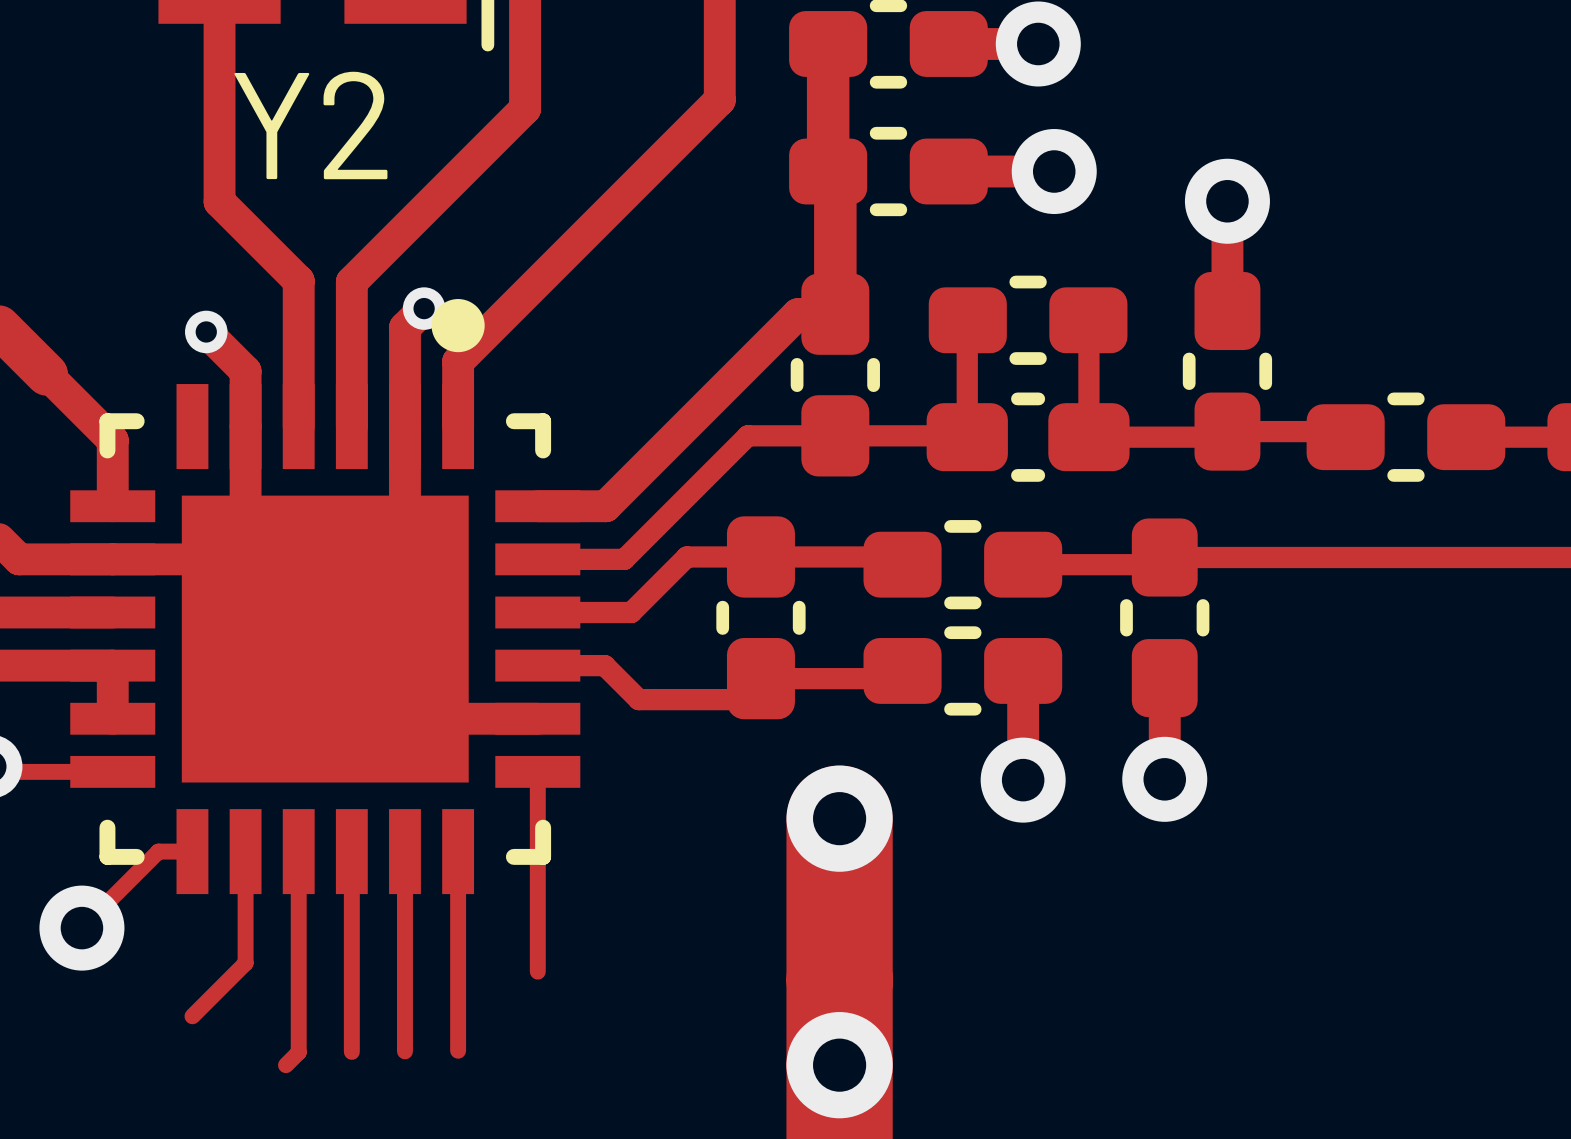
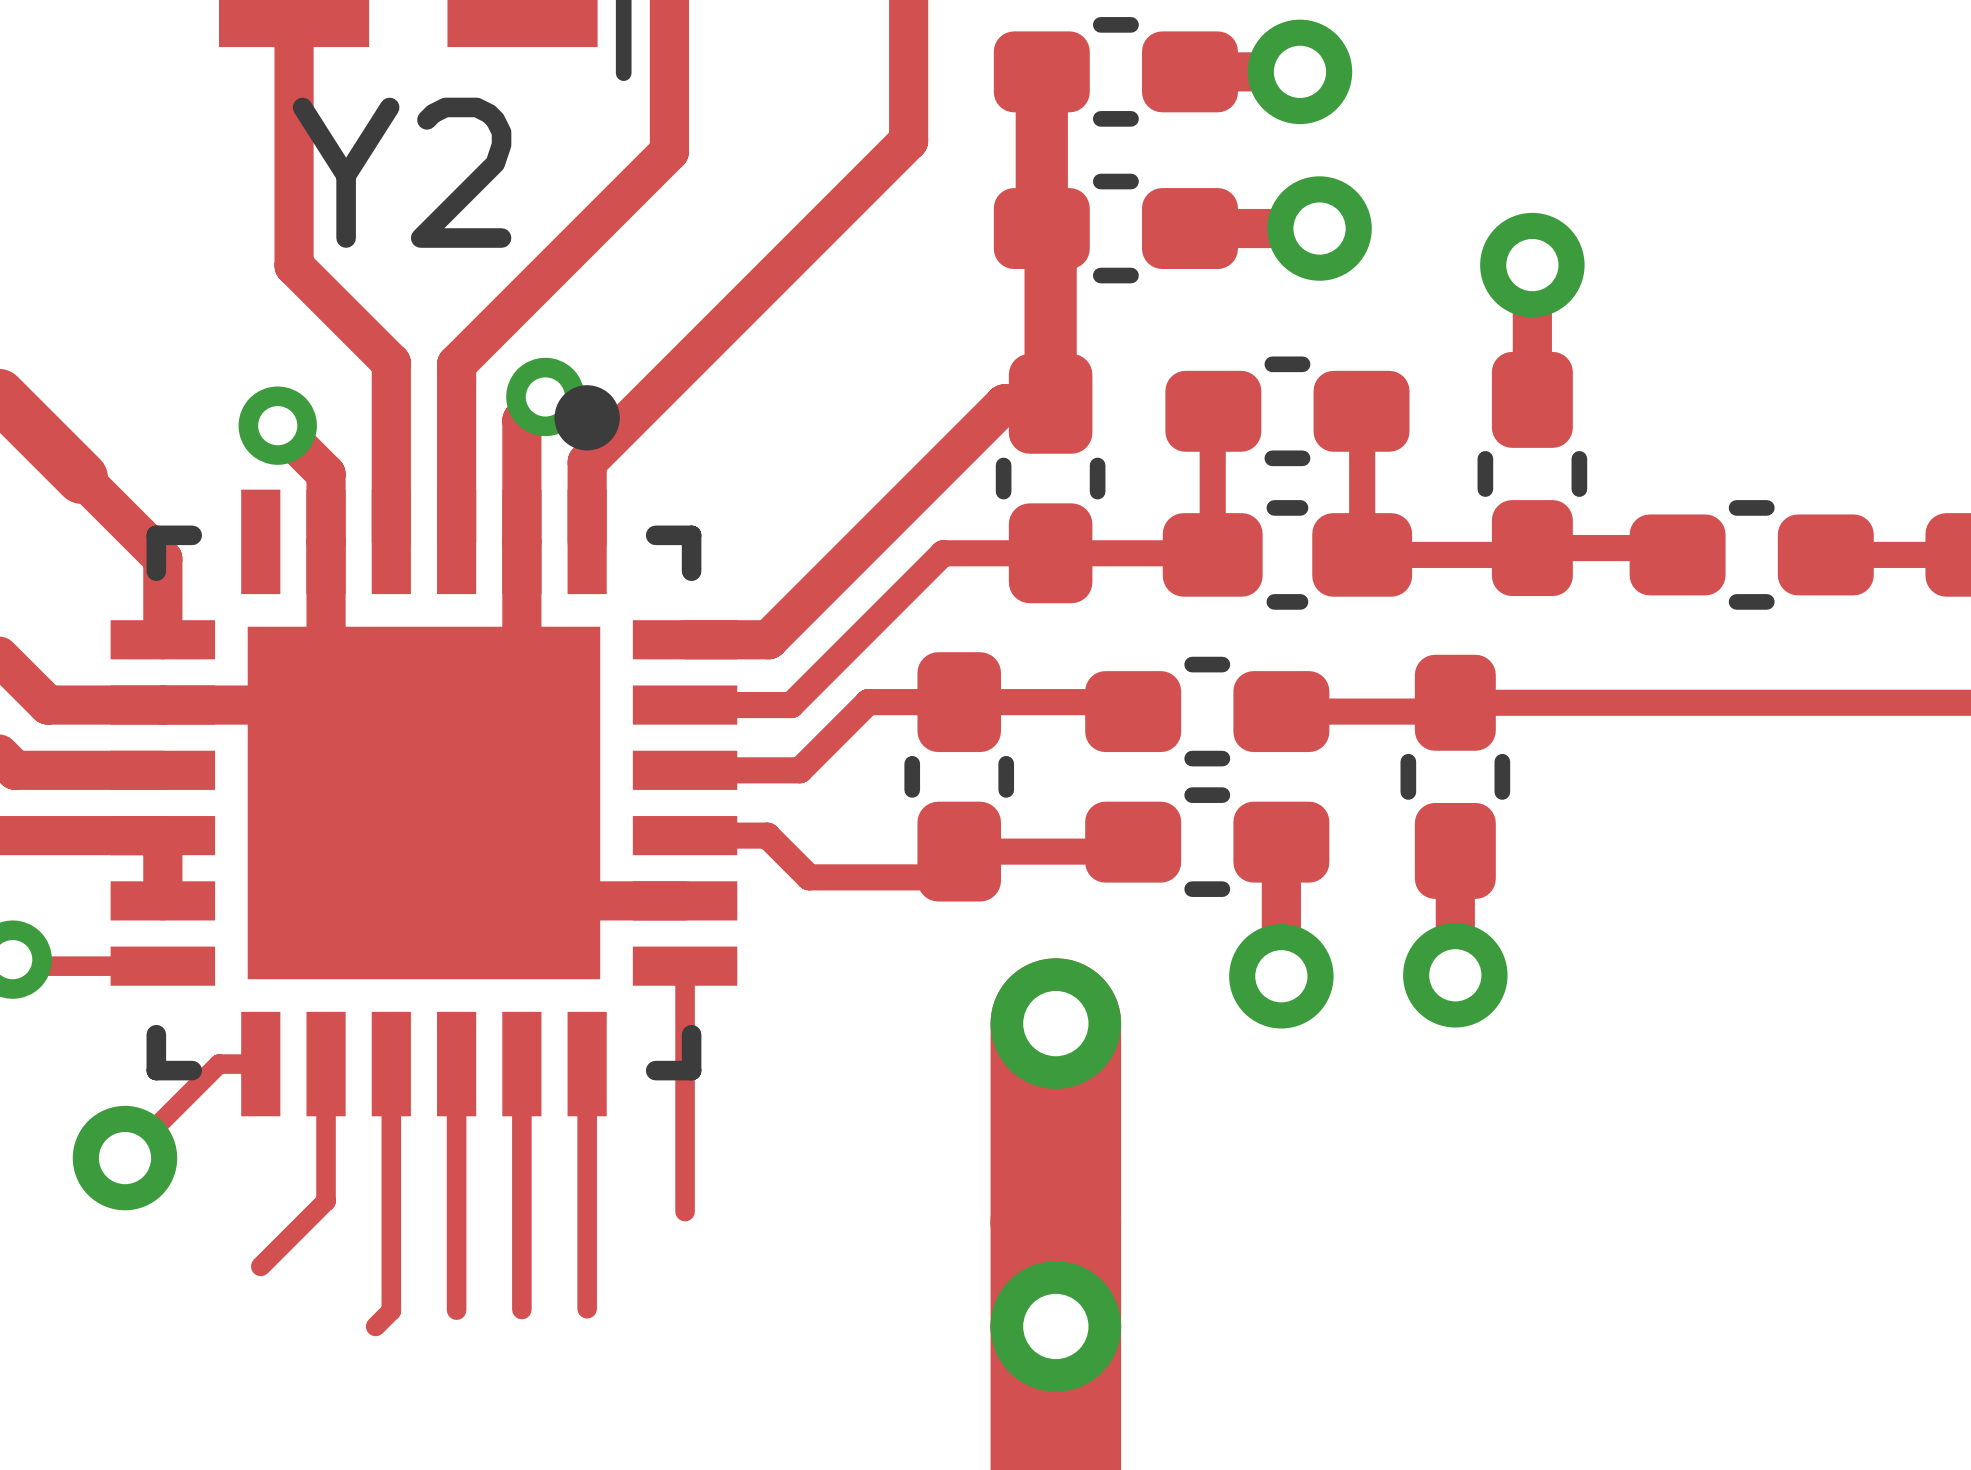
via size: [402, 287, 446, 330] -> [506, 357, 585, 437]
via size: [185, 310, 228, 354] -> [238, 386, 317, 465]

